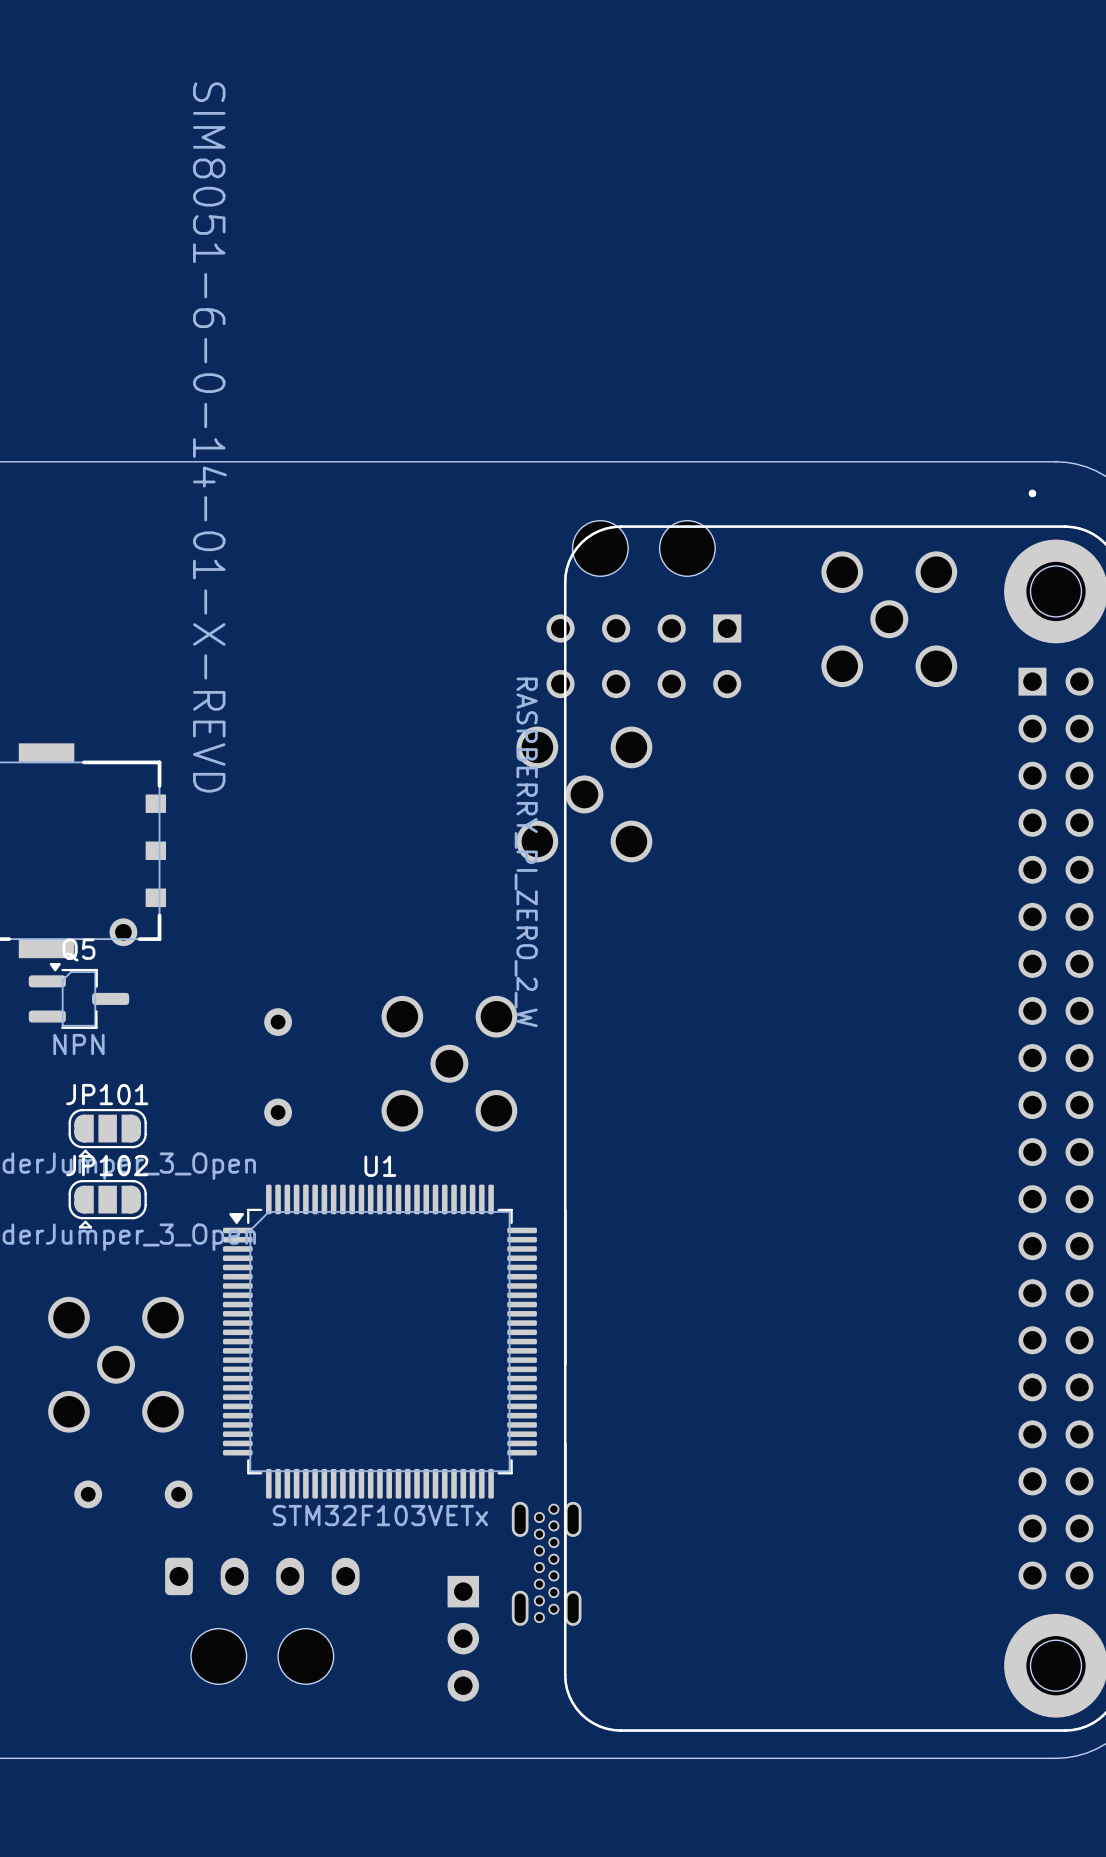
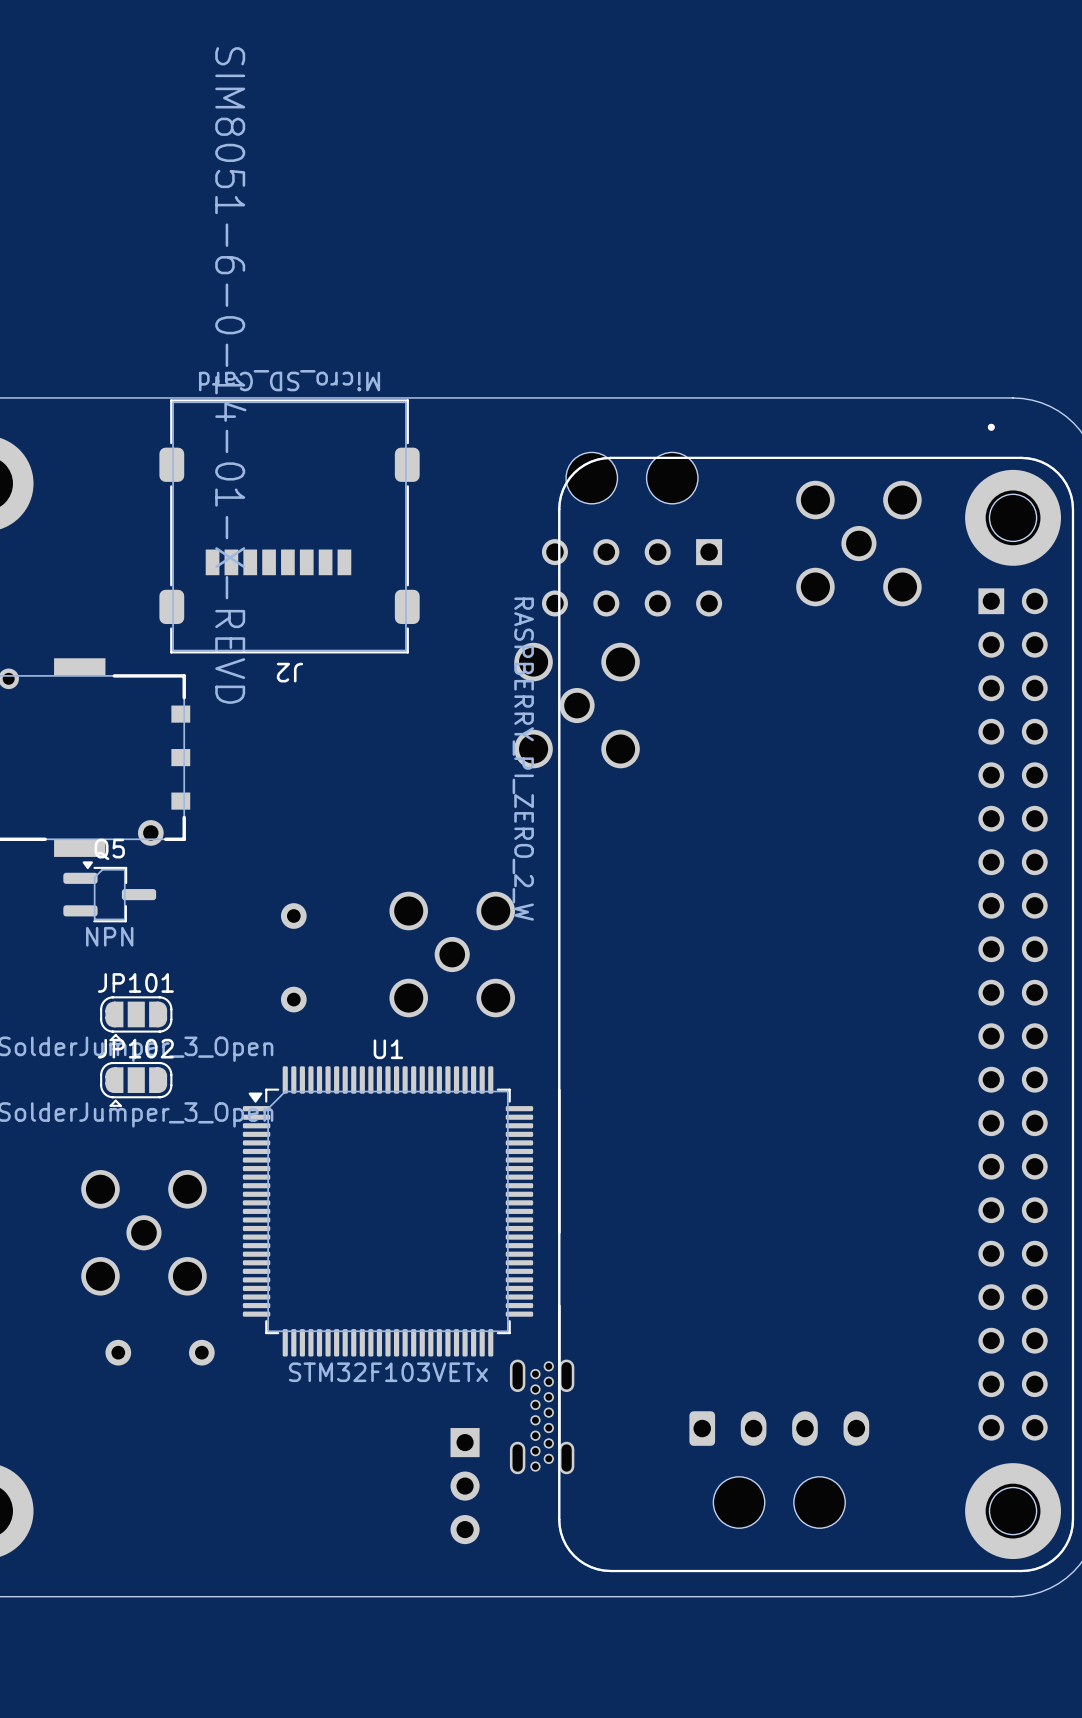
J2: none -> Micro_SD_Card (289, 526)
part: (262, 1620) -> none
part: none -> (779, 1469)

